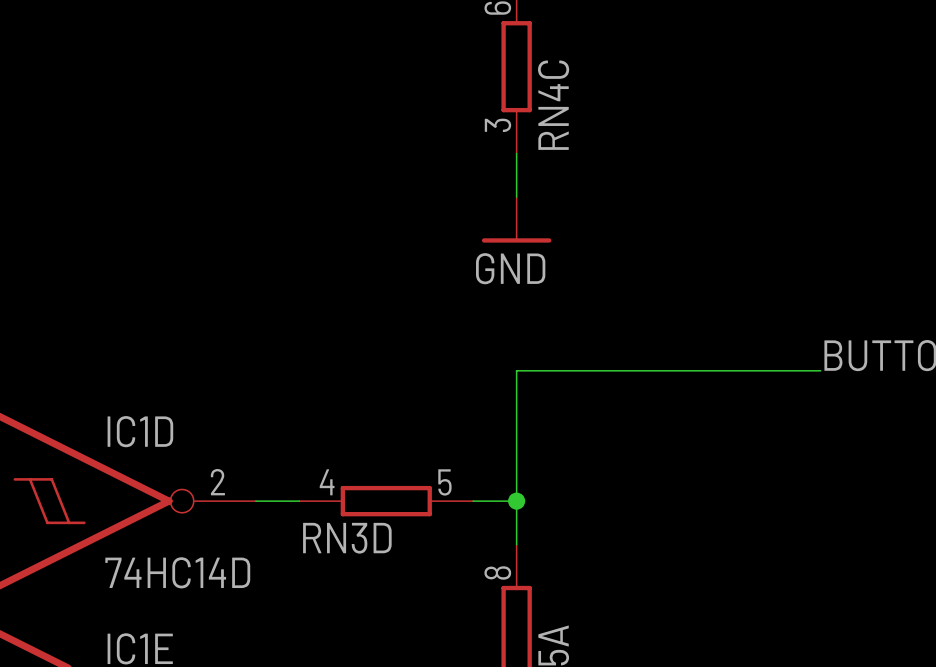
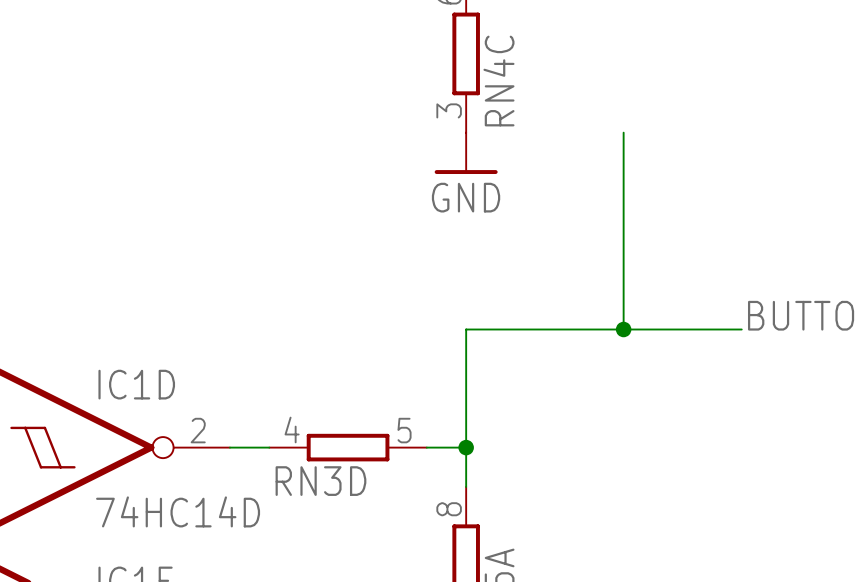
wire: none -> (623, 132) (623, 329)
power symbol position: GND (516, 219) -> GND (466, 153)
junction: none -> (623, 329)

